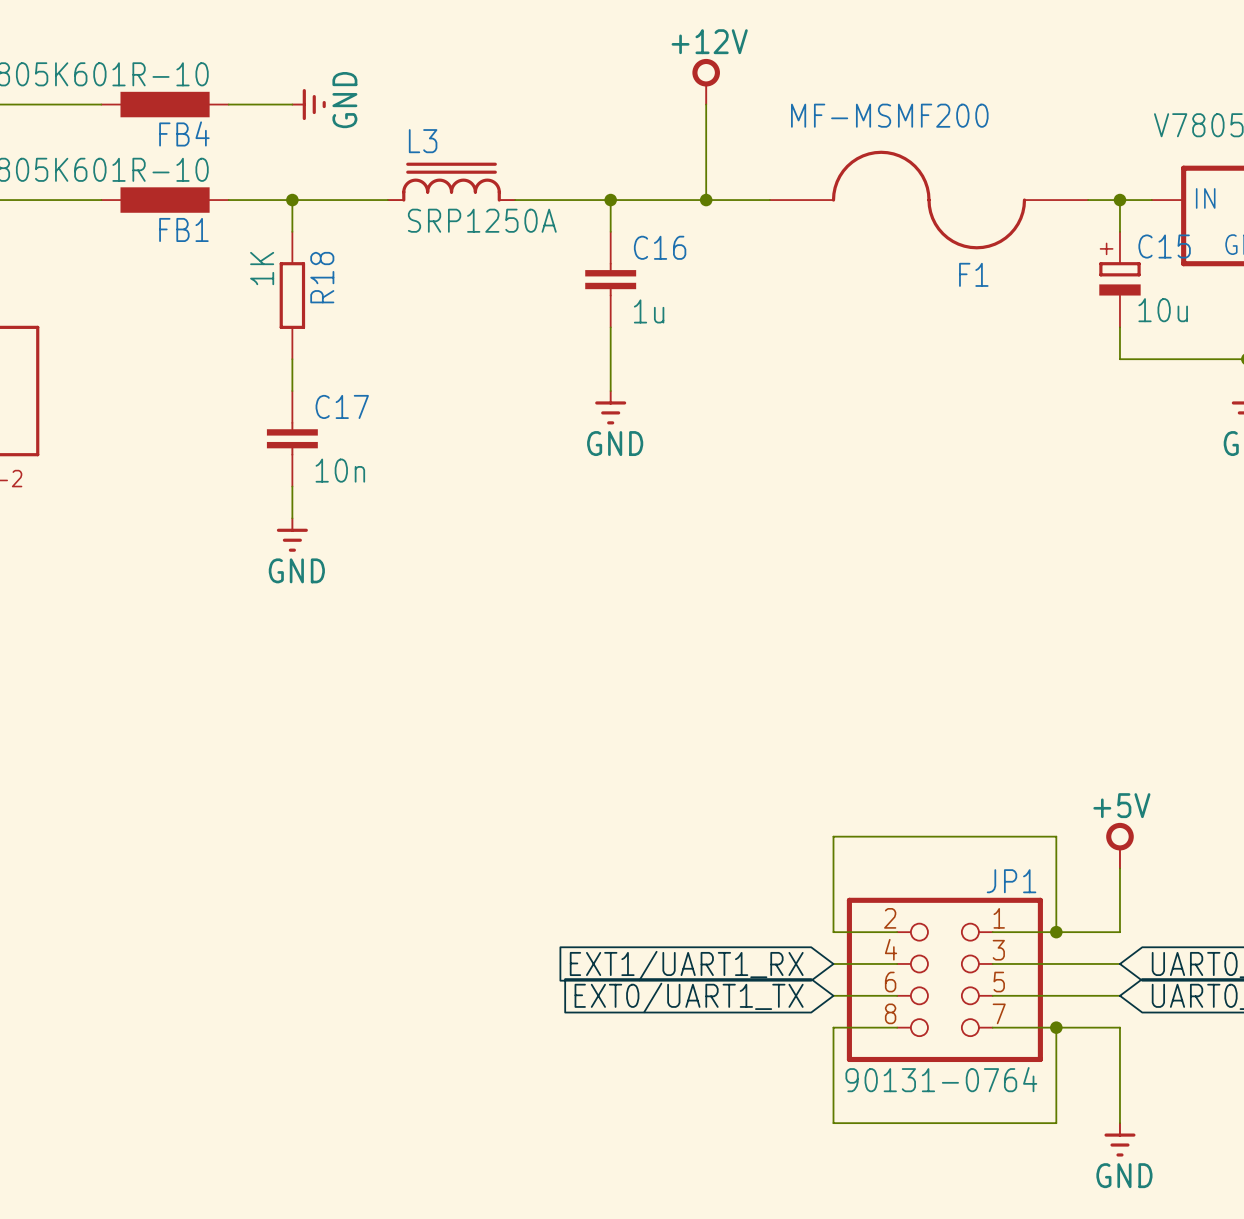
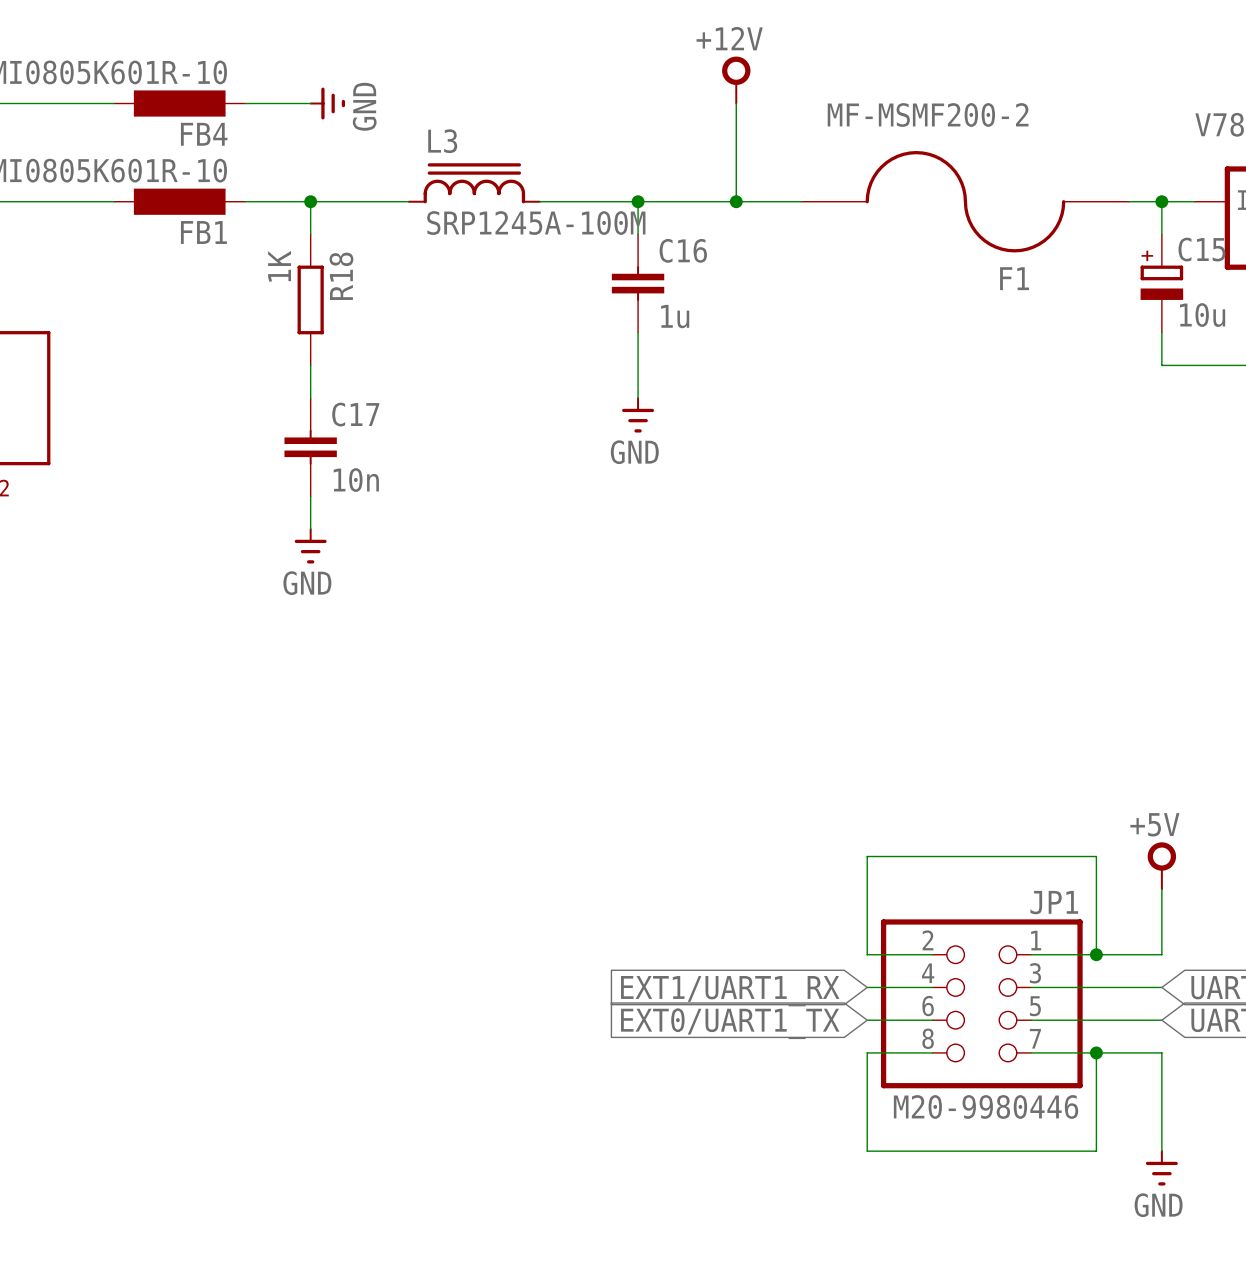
F1 value: MF-MSMF200 (889, 115) -> MF-MSMF200-2 (928, 114)
L3 value: SRP1250A (482, 220) -> SRP1245A-100M (536, 223)
JP1 value: 90131-0764 (941, 1079) -> M20-9980446 (986, 1106)

